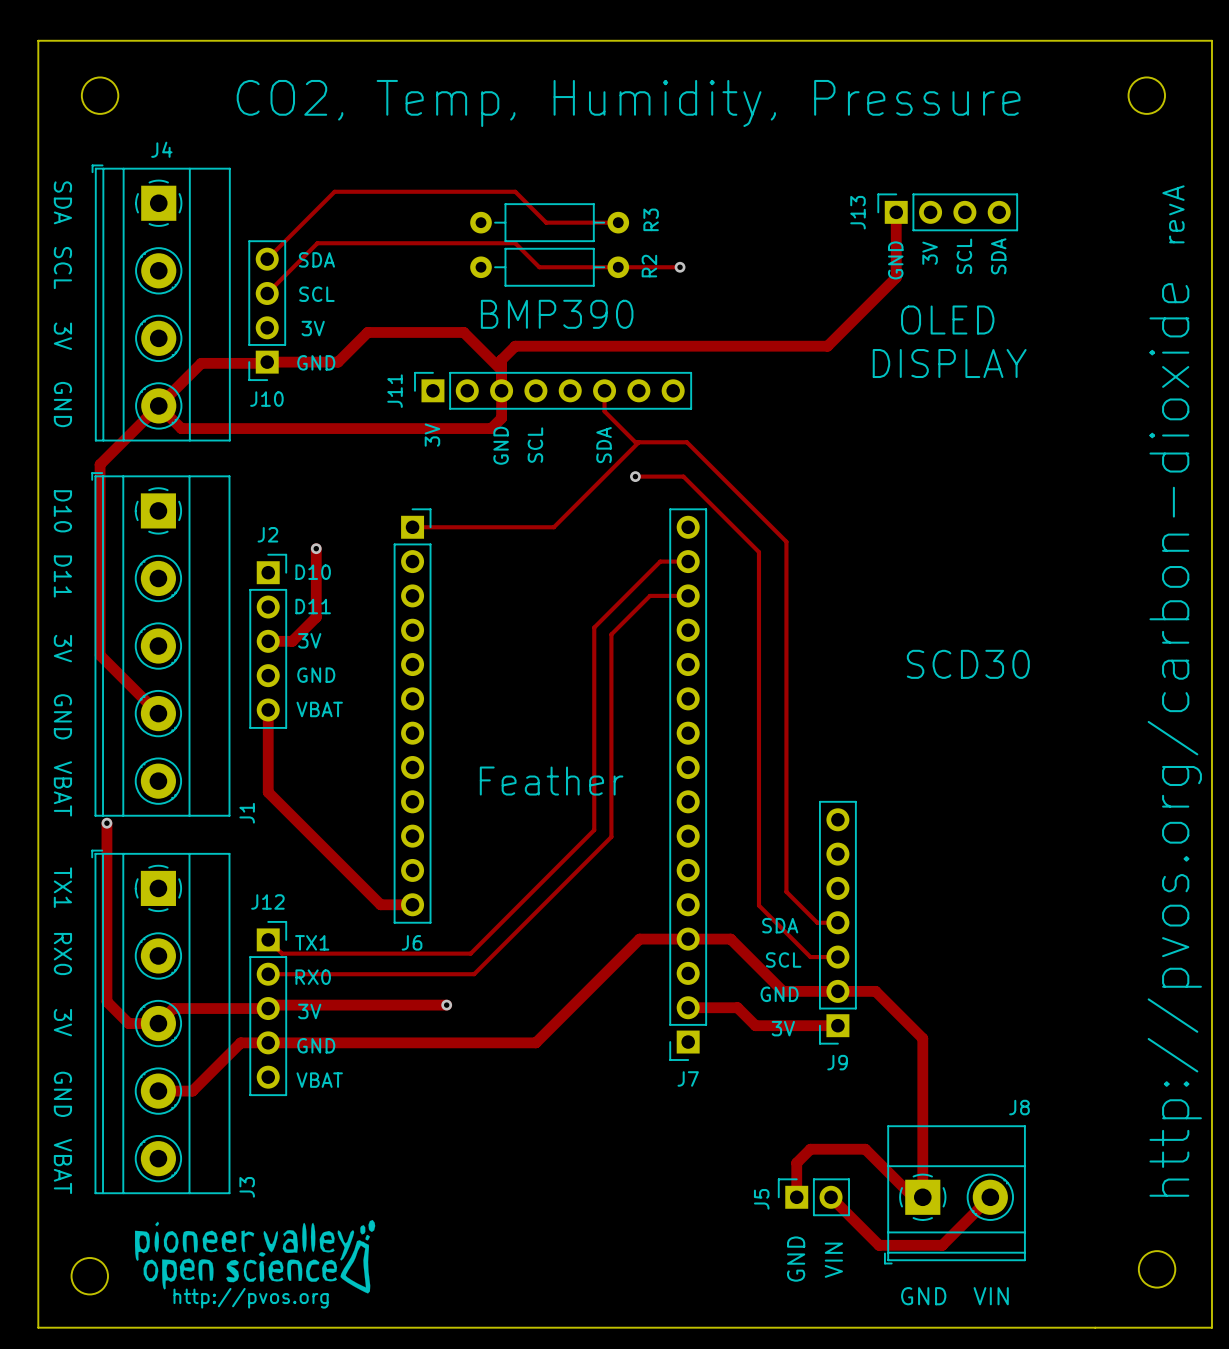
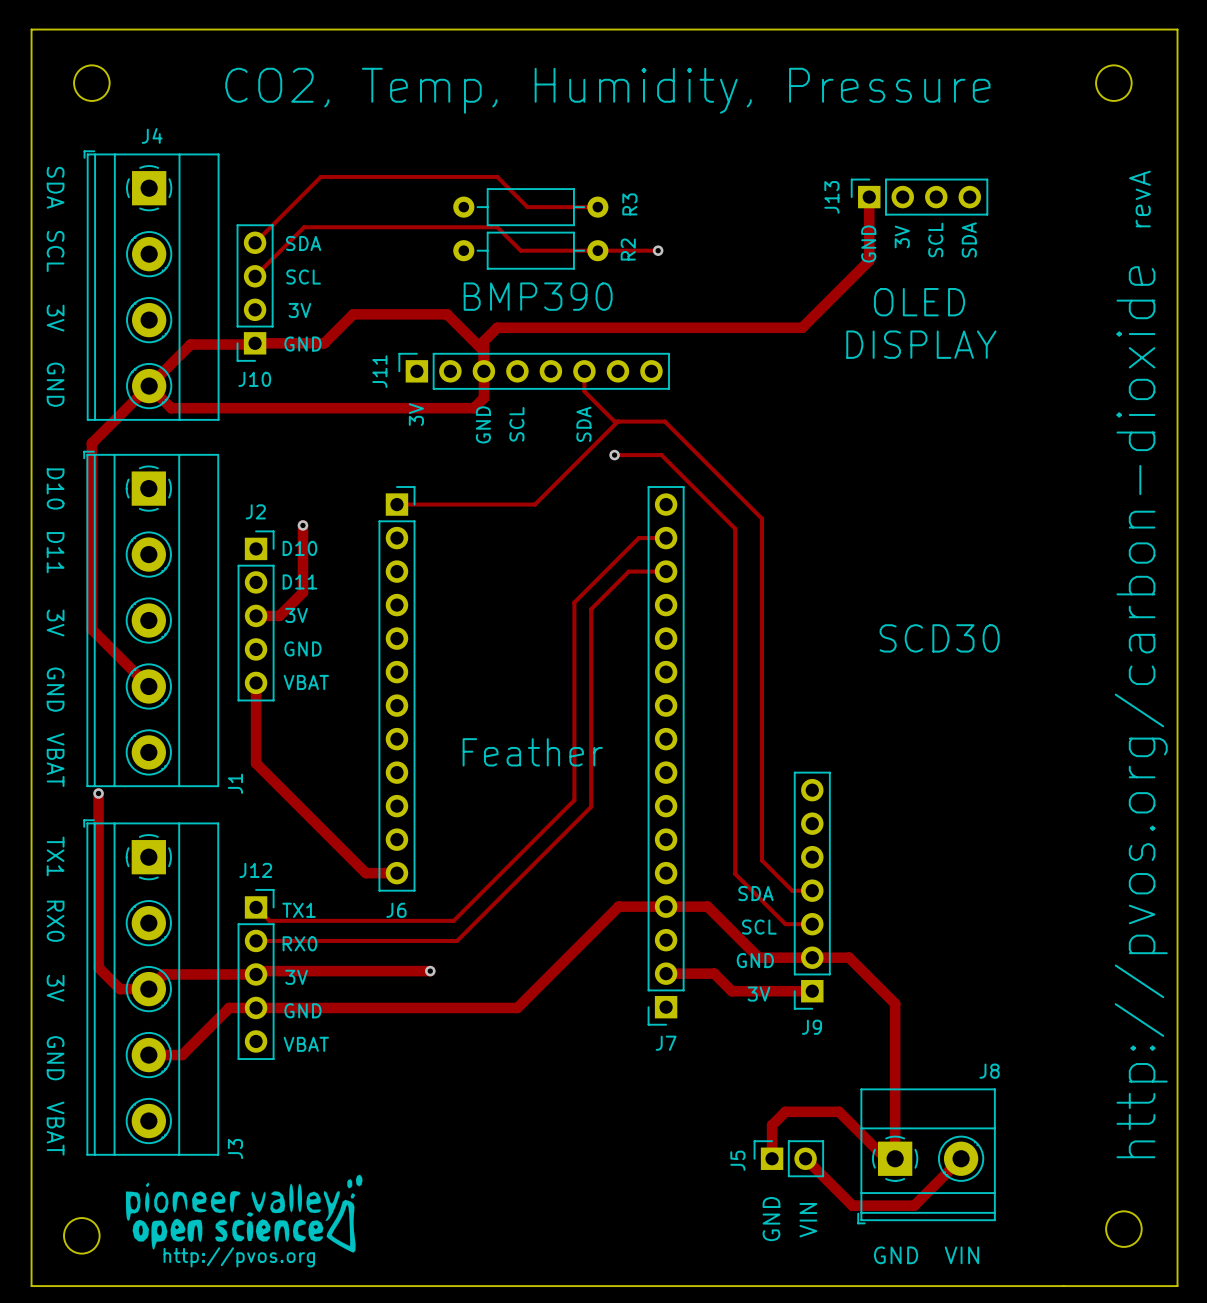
drawing shape: [134, 1219, 376, 1294] -> [125, 1174, 363, 1253]

